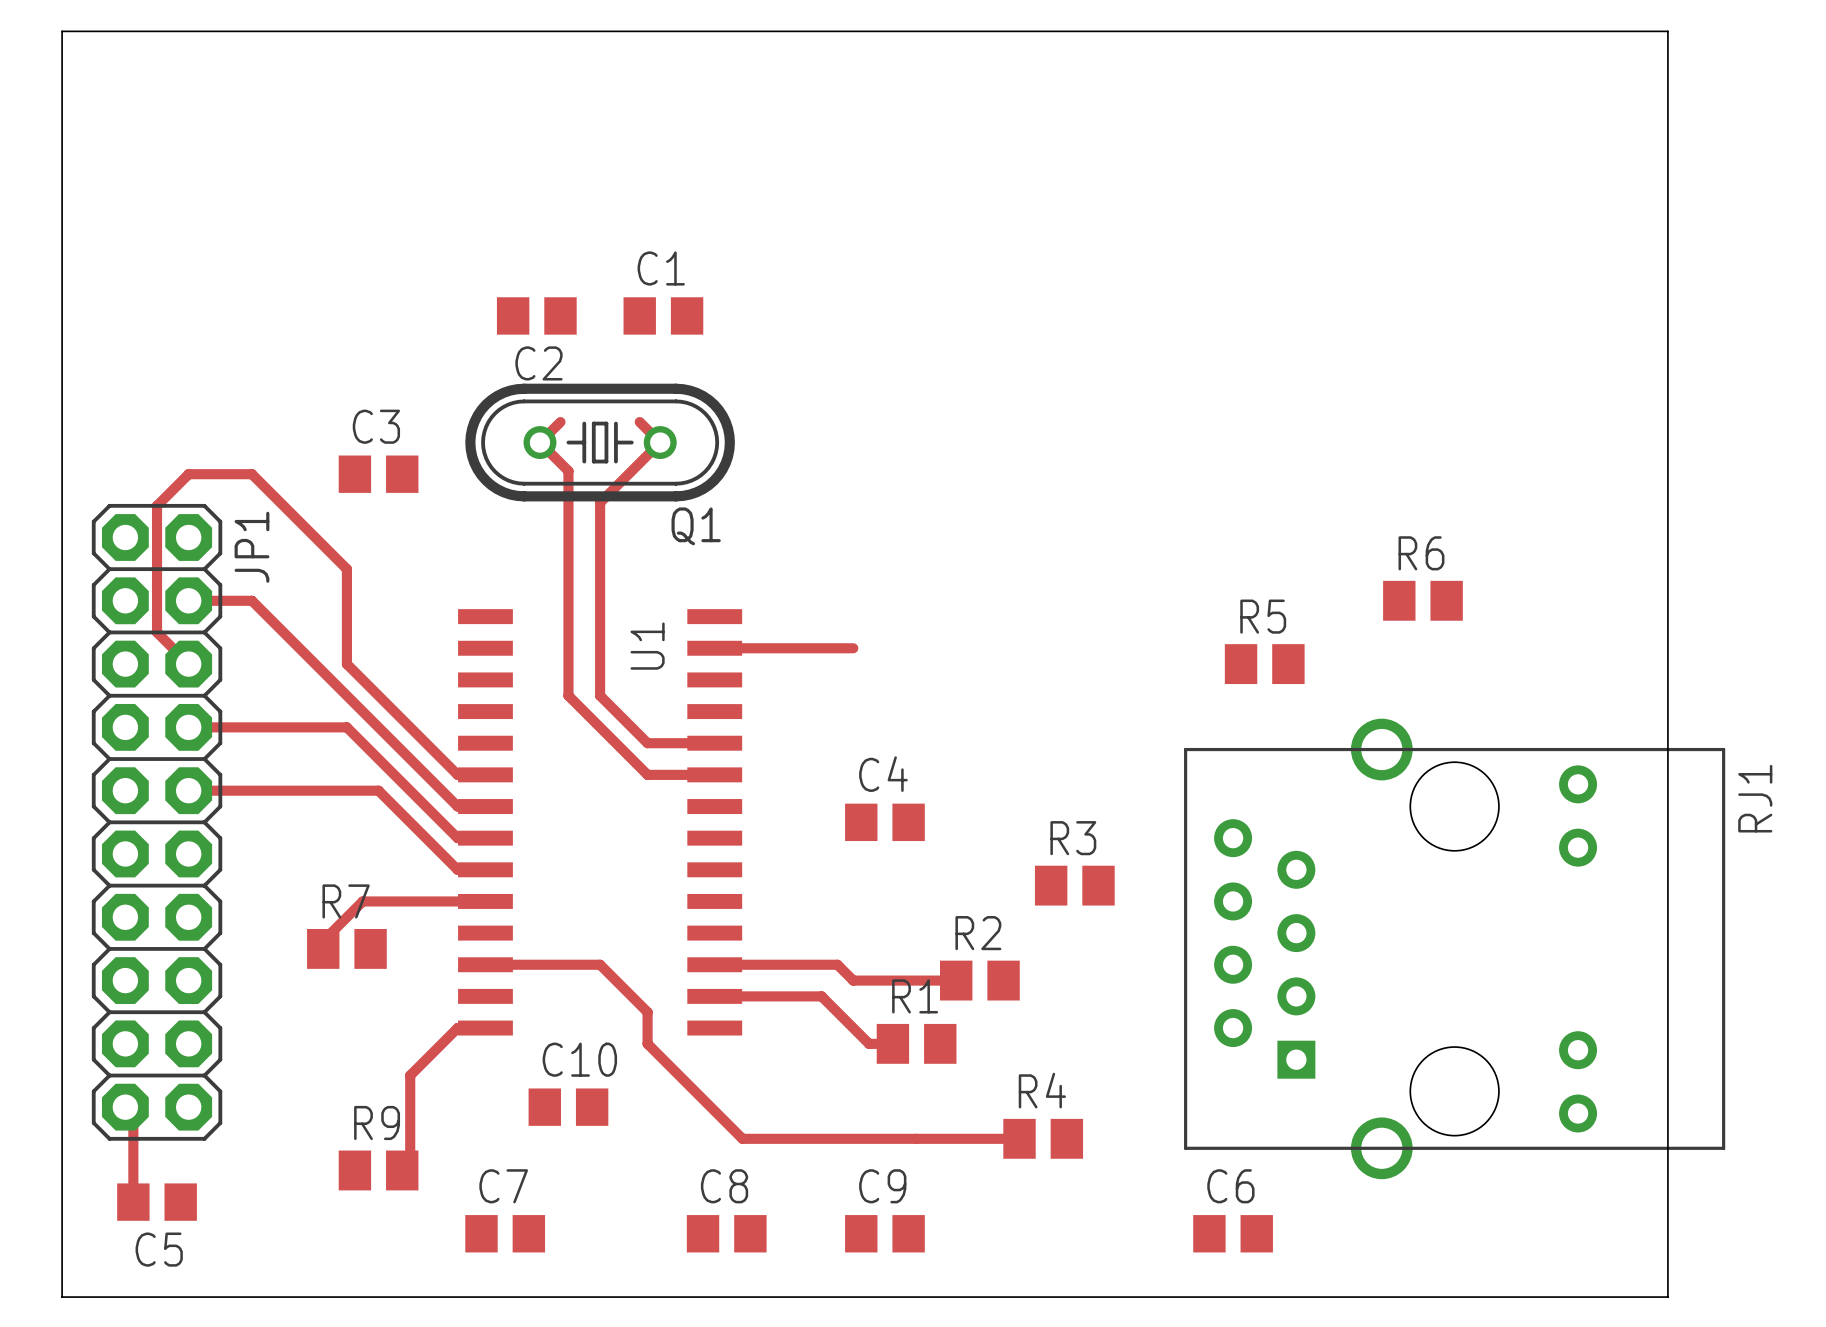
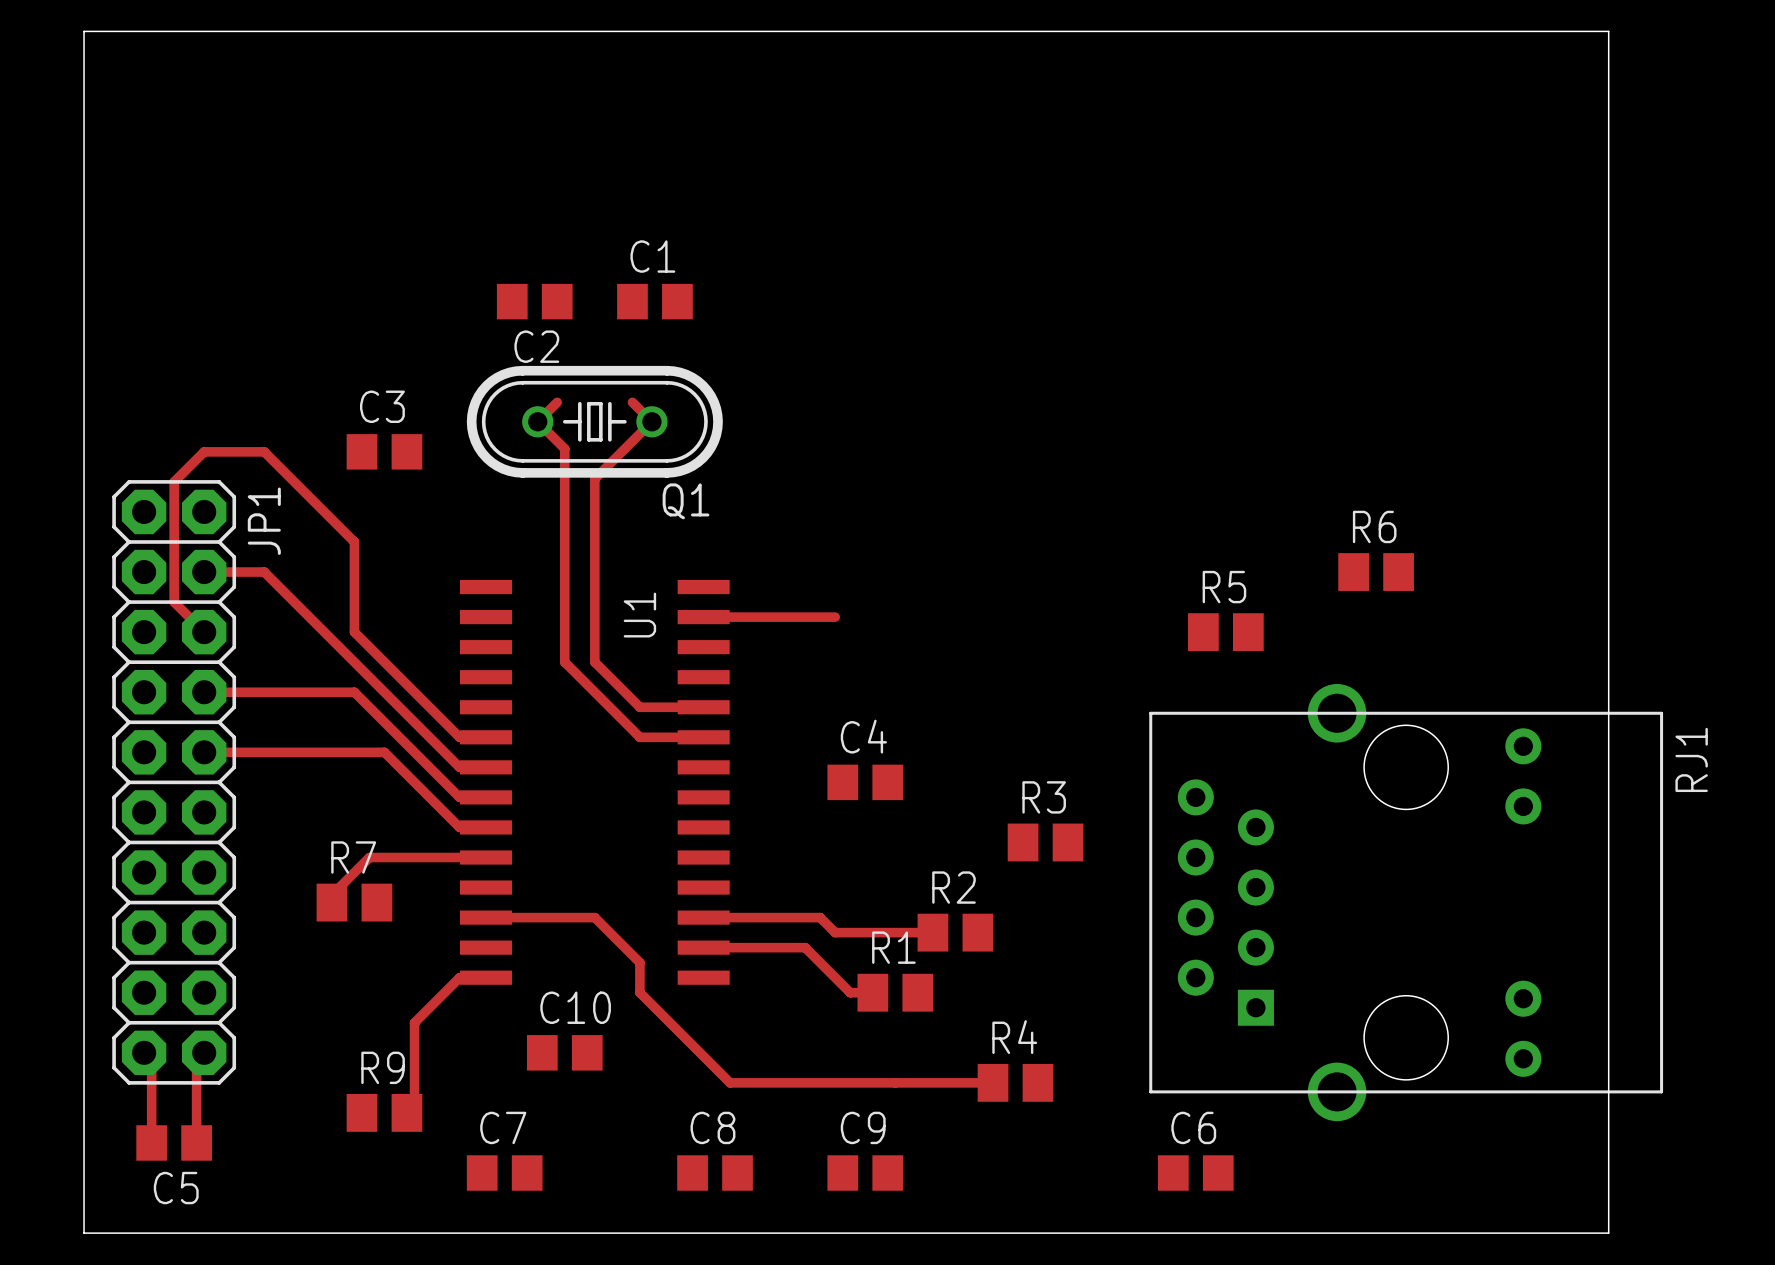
track: none -> (196, 1060) (196, 1142)

